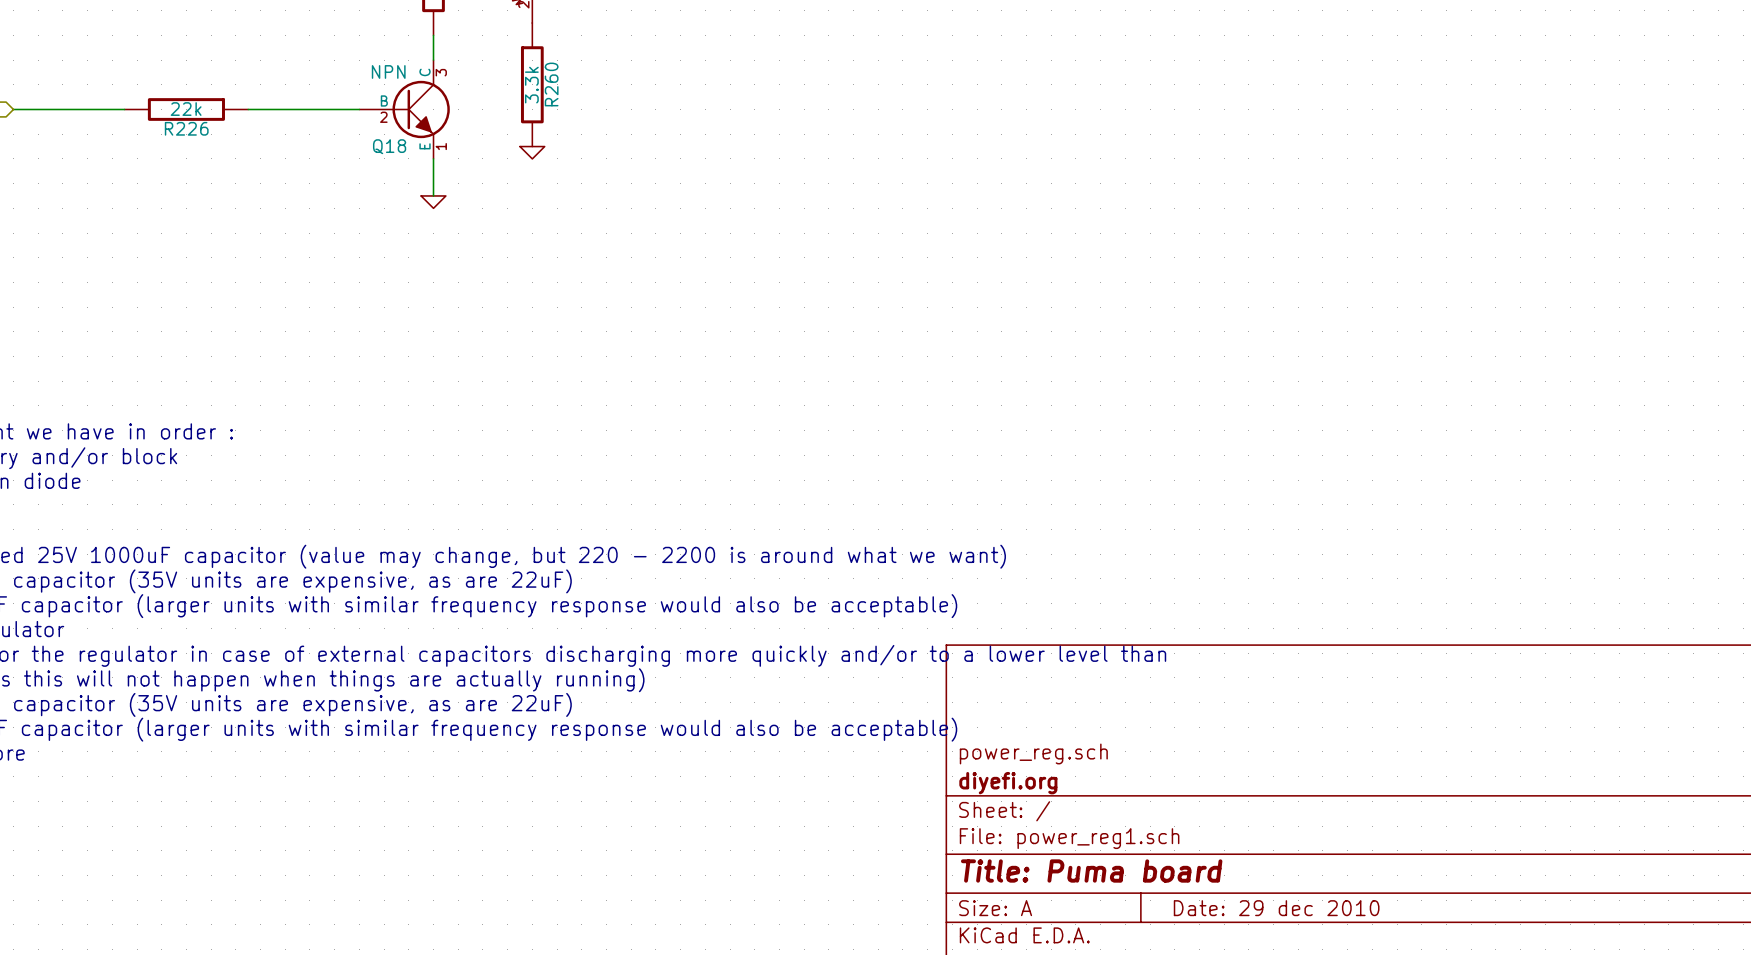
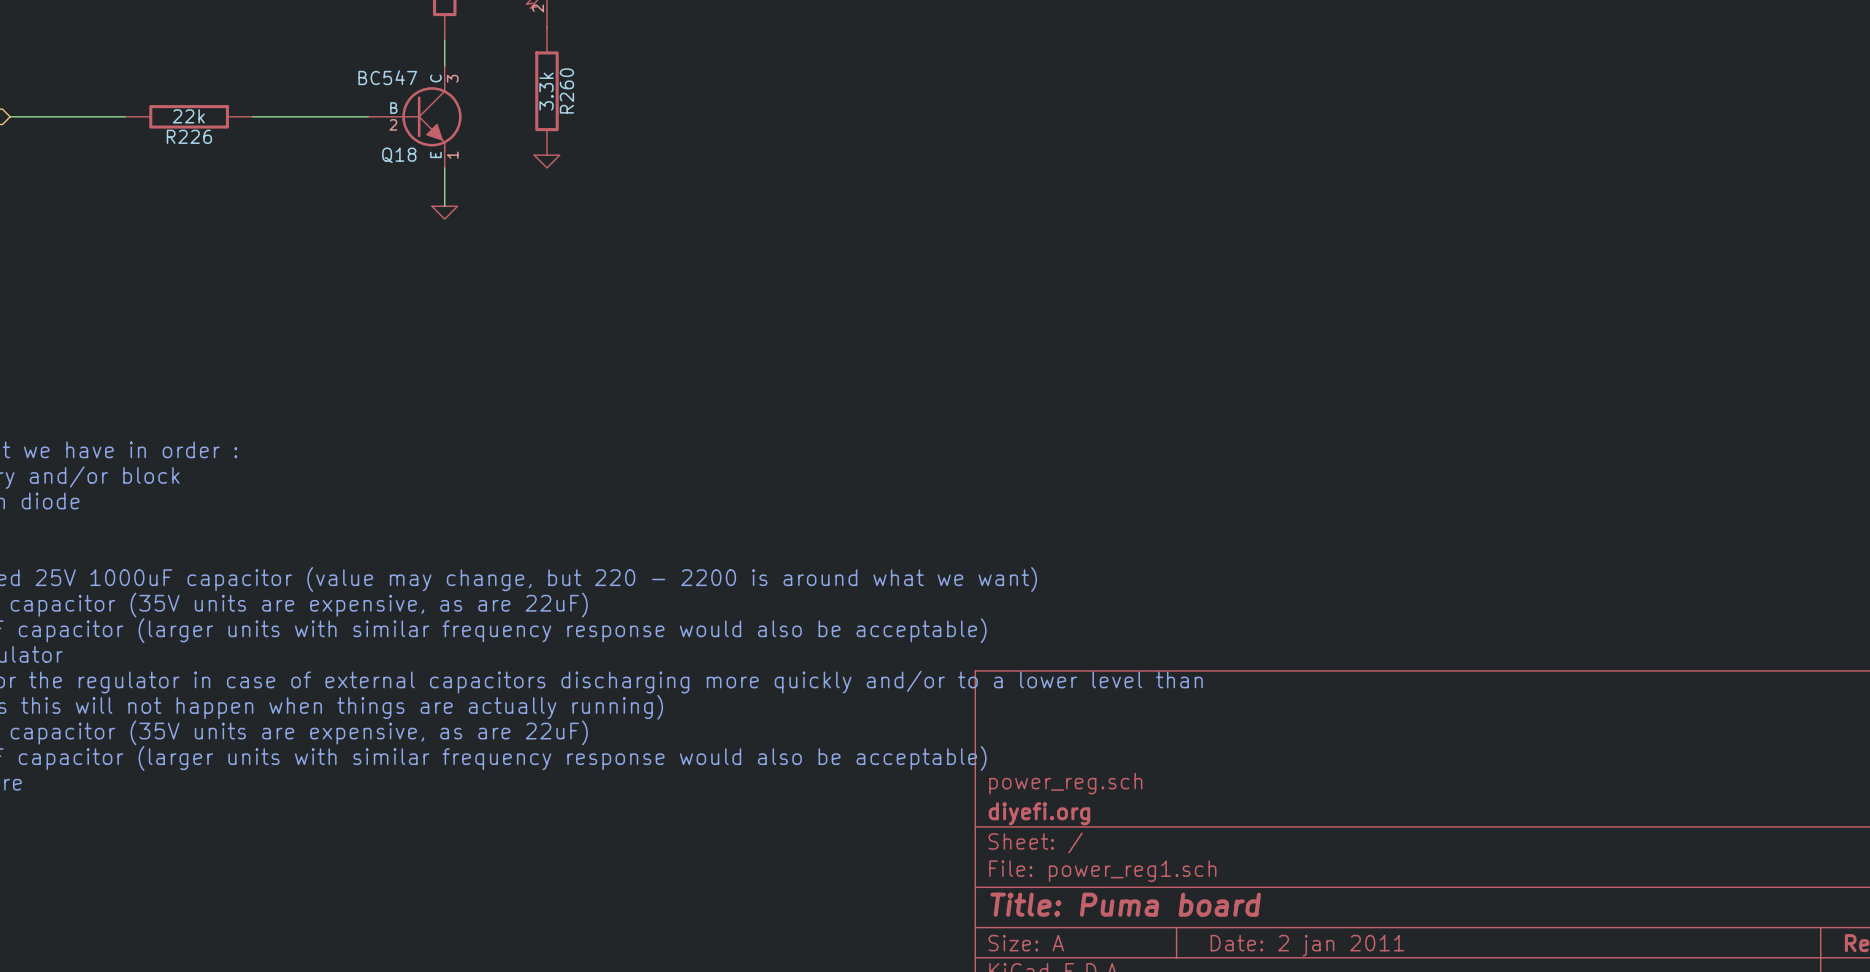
Q18 value: NPN (388, 71) -> BC547 (387, 77)
title block: Date: 29 dec 2010 (1276, 908) -> Date: 2 jan 2011 (1307, 945)

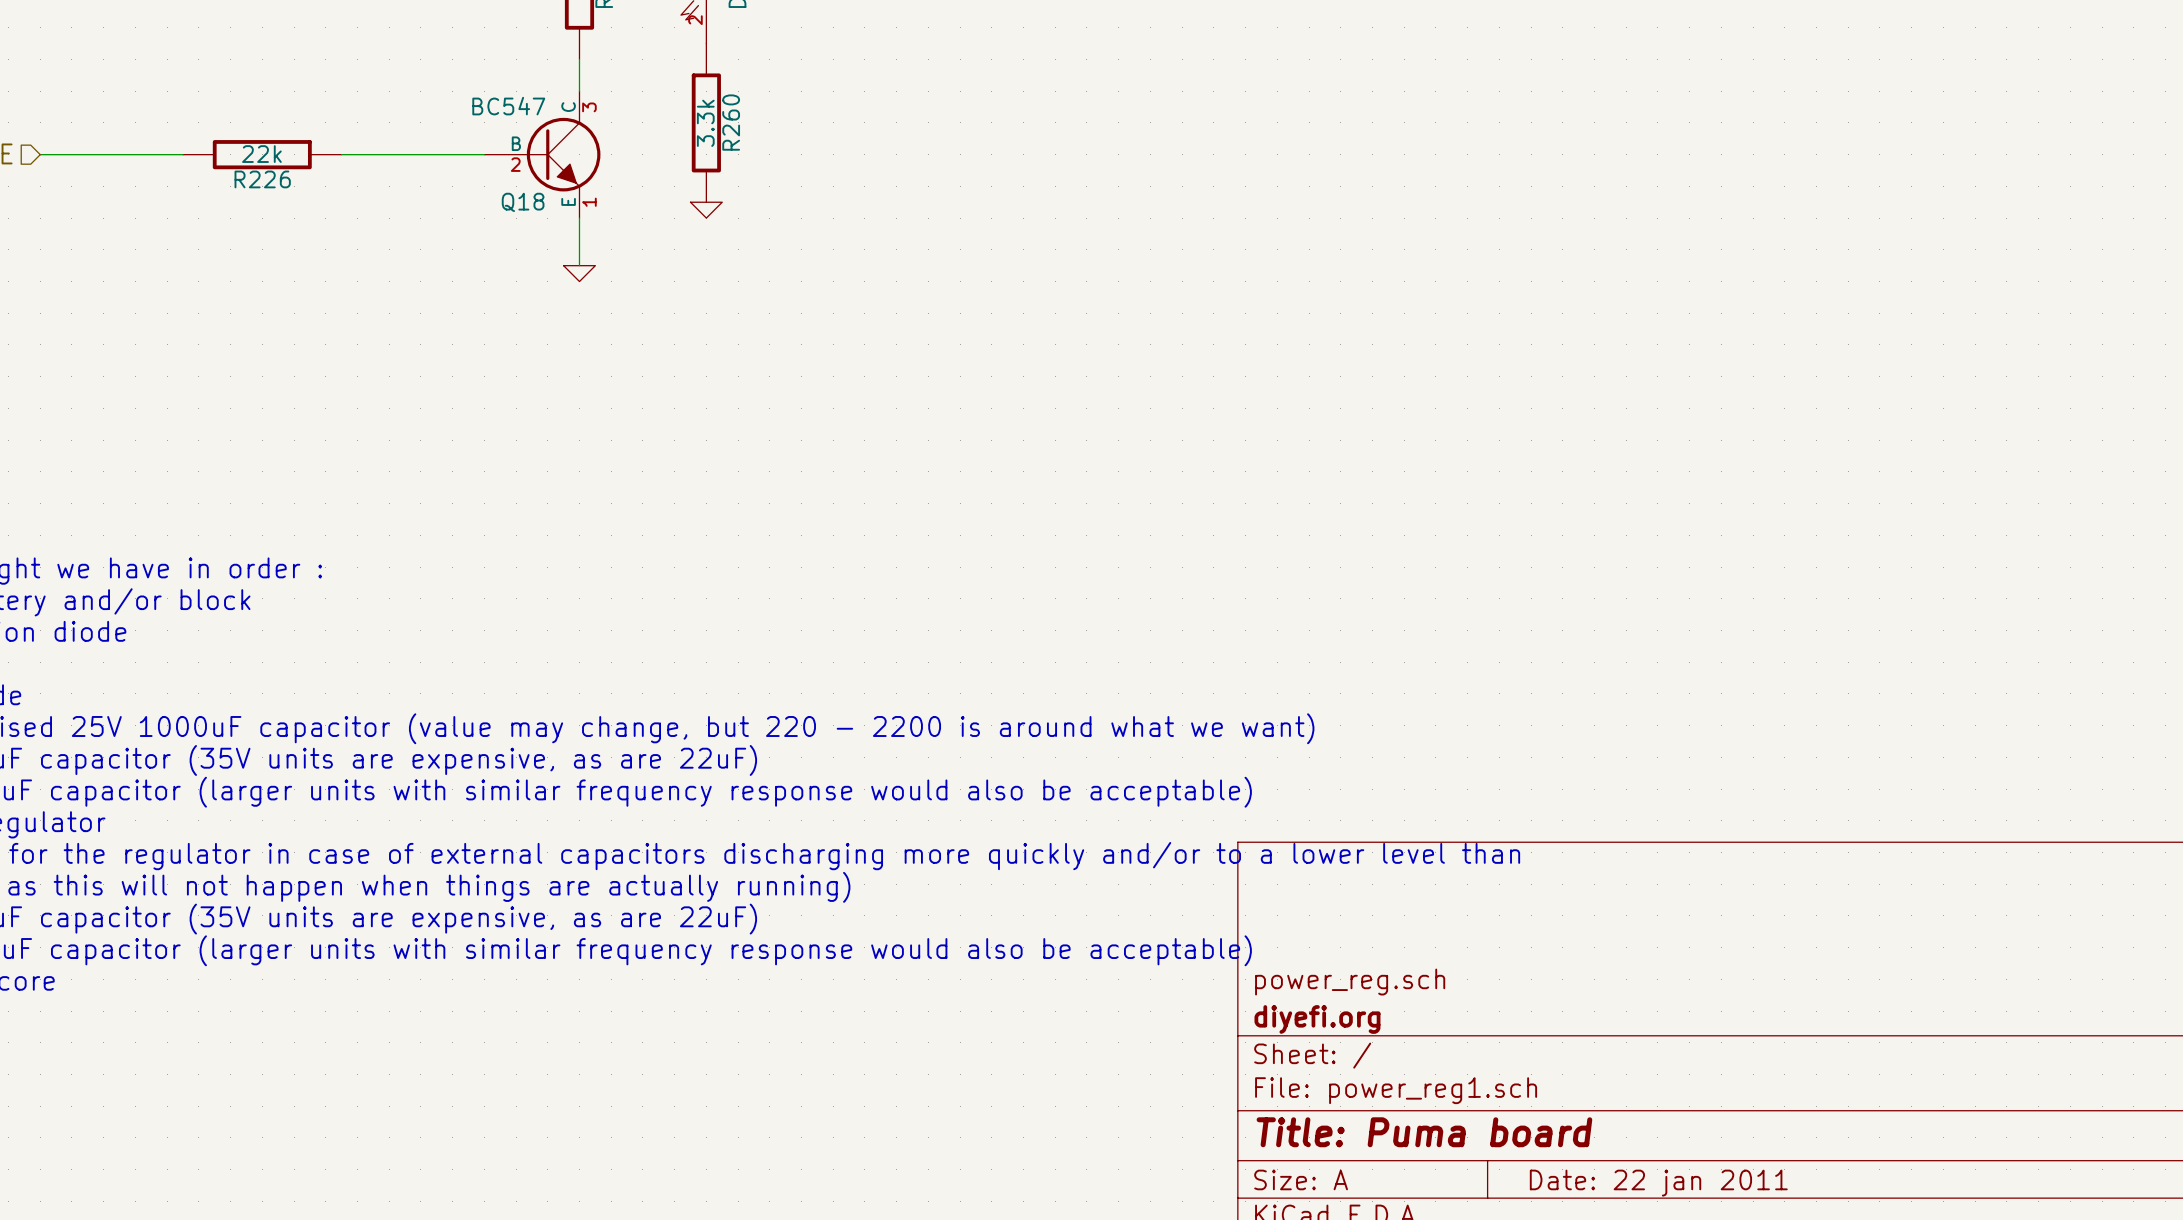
title block: Date: 2 jan 2011 (1307, 945) -> Date: 22 jan 2011 (1658, 1183)

